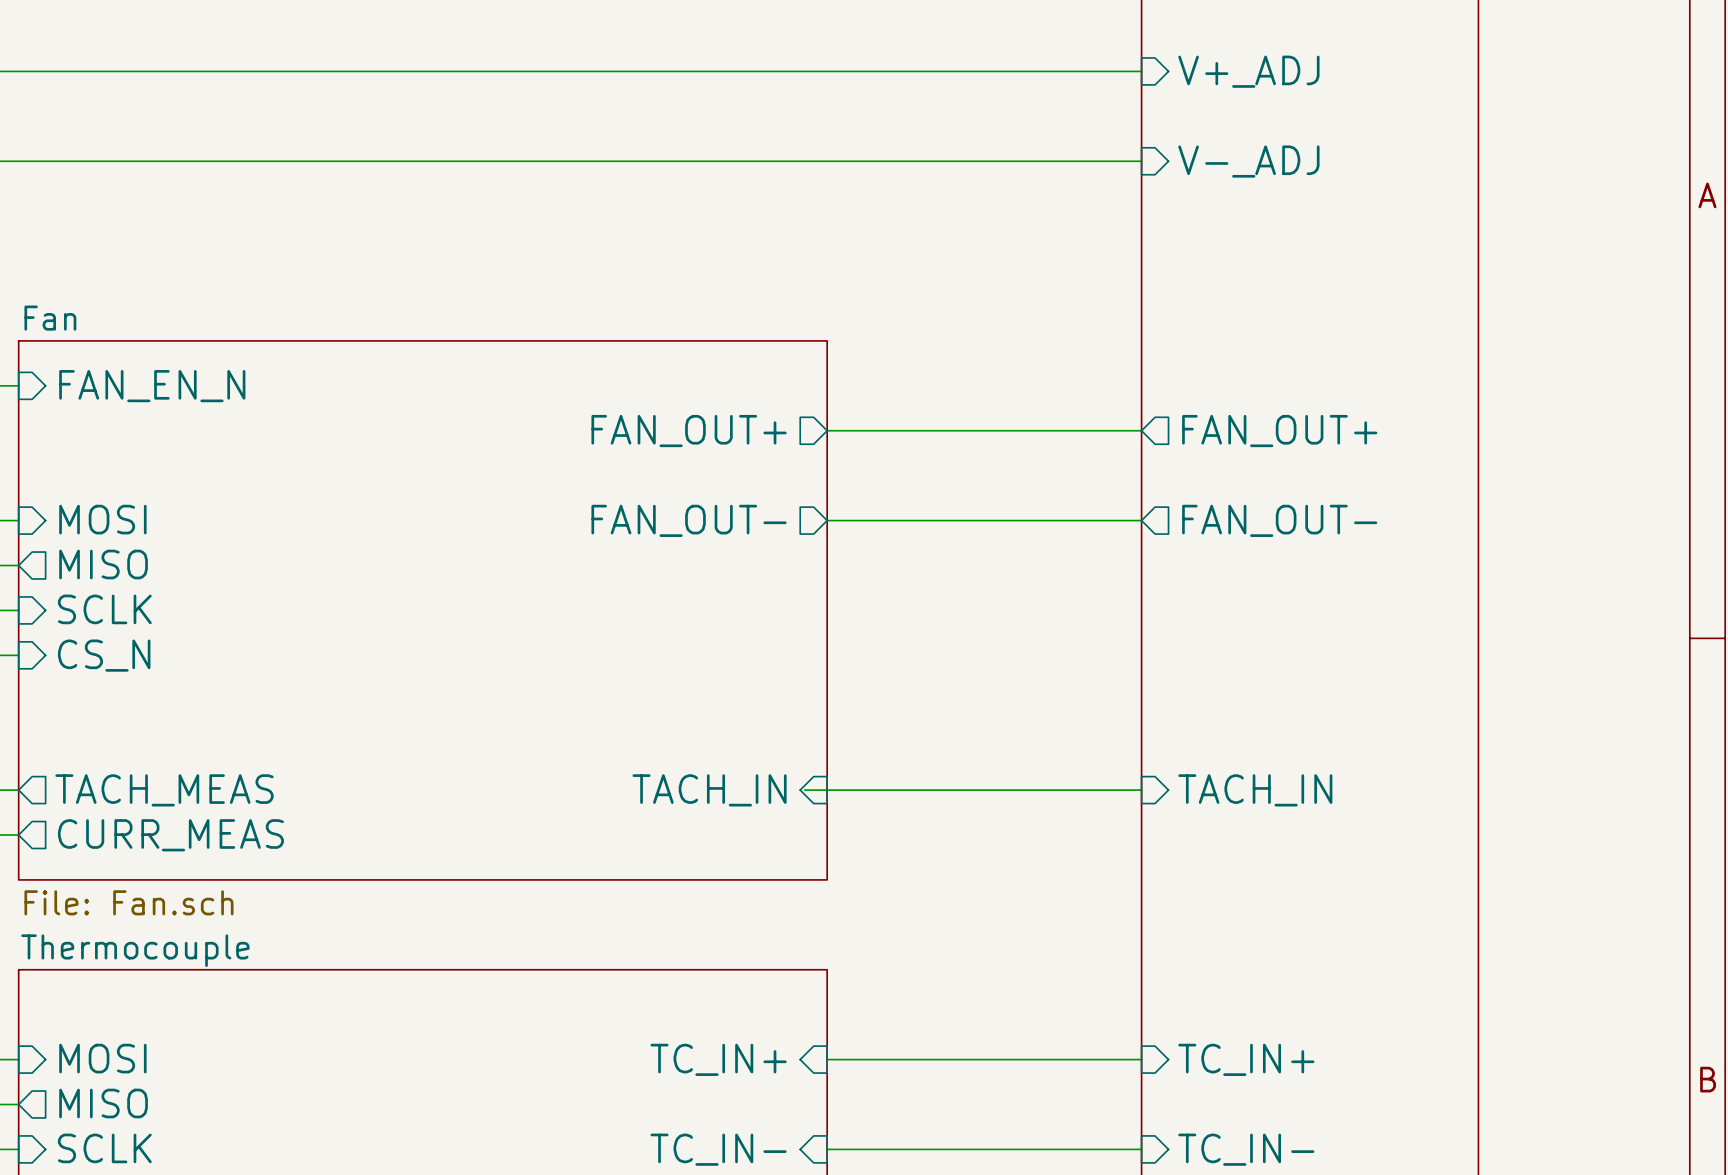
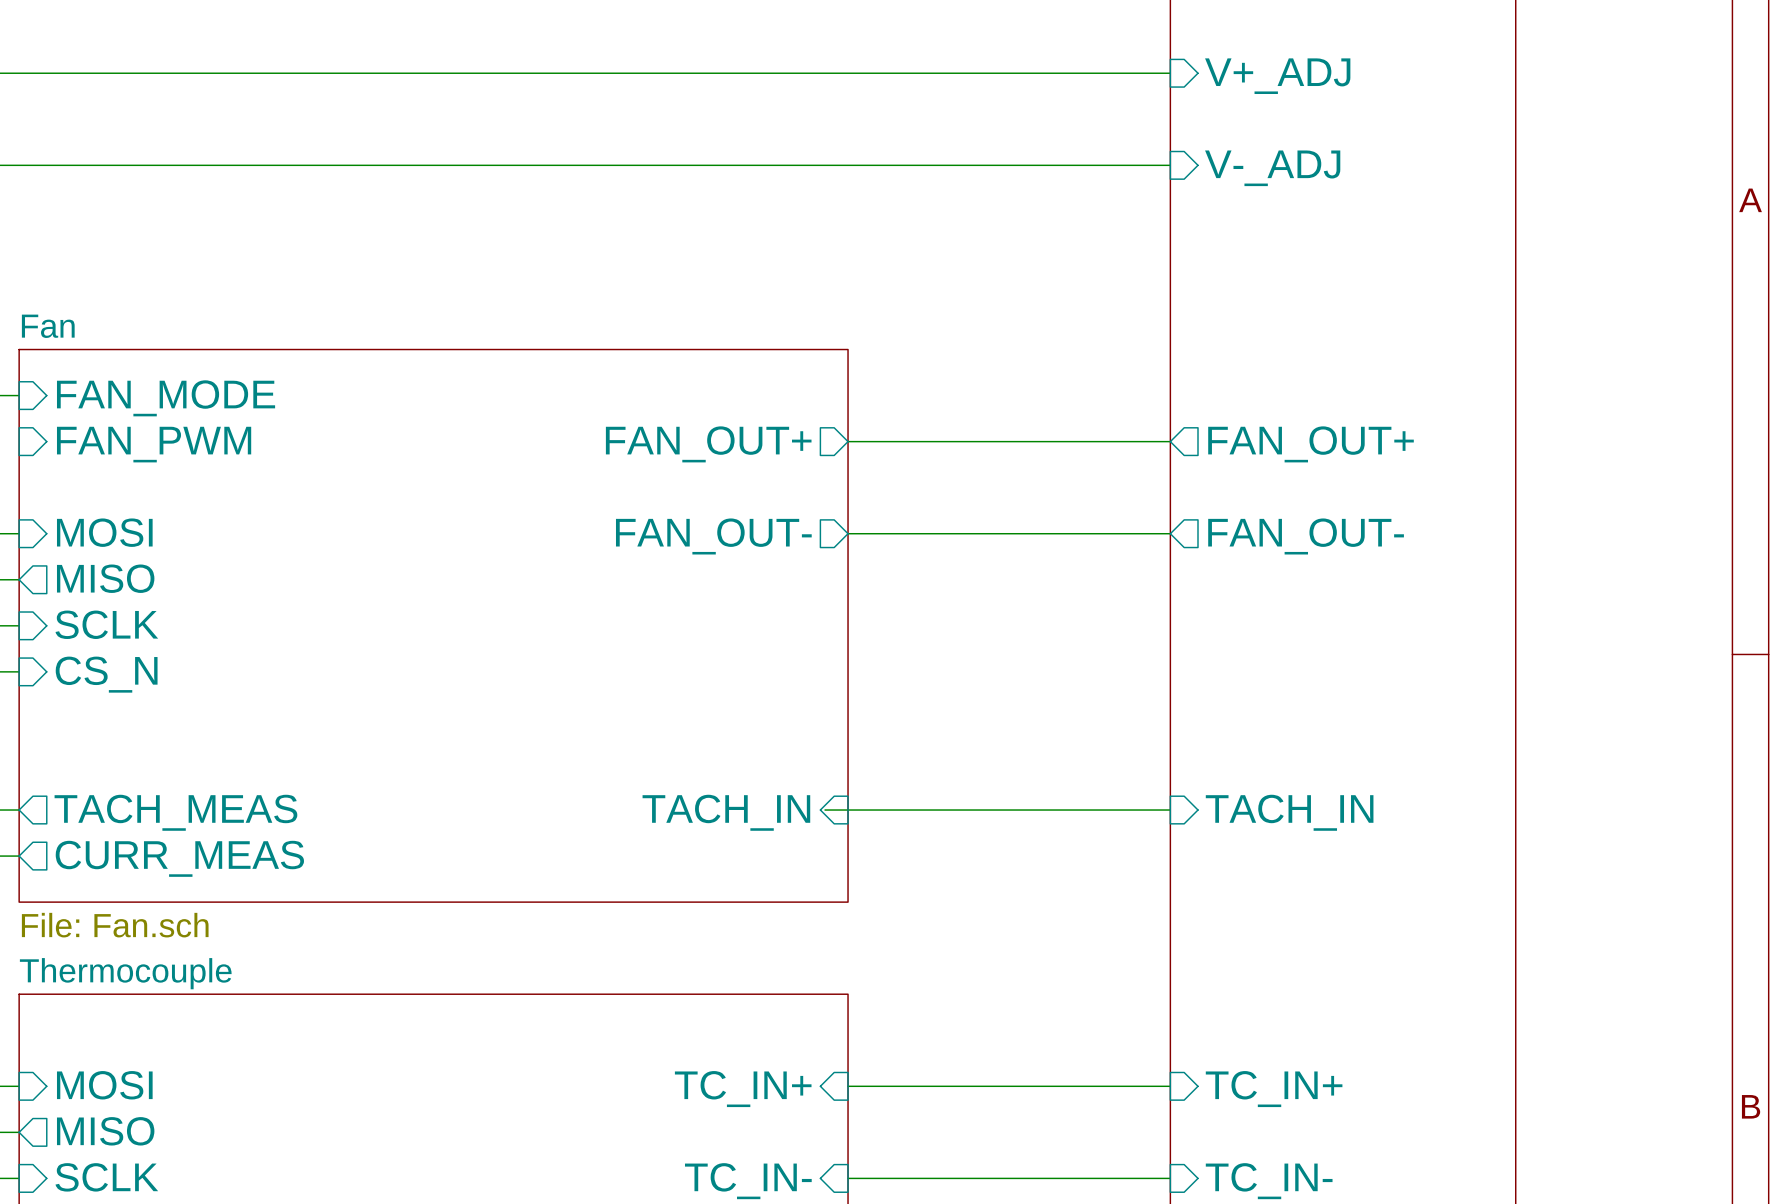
sheet pin: FAN_EN_N (152, 386) -> FAN_MODE (166, 398)
sheet pin: none -> FAN_PWM (154, 444)

